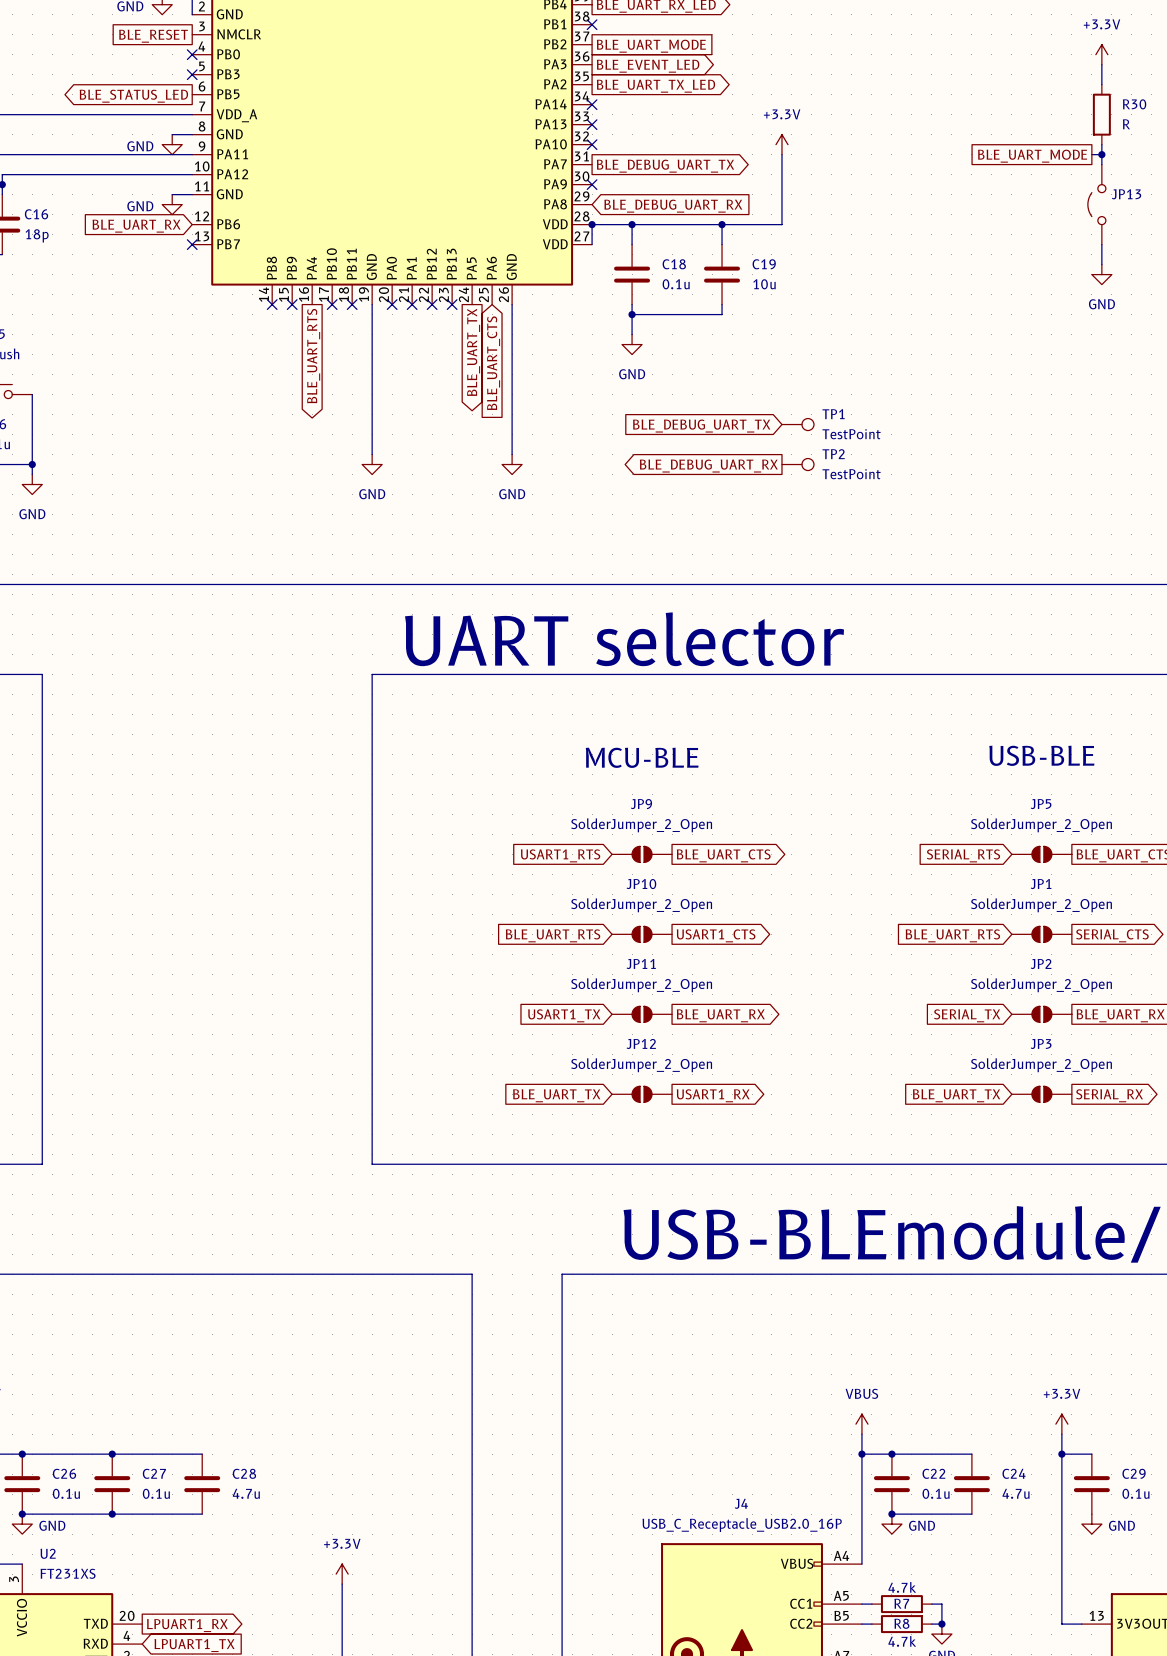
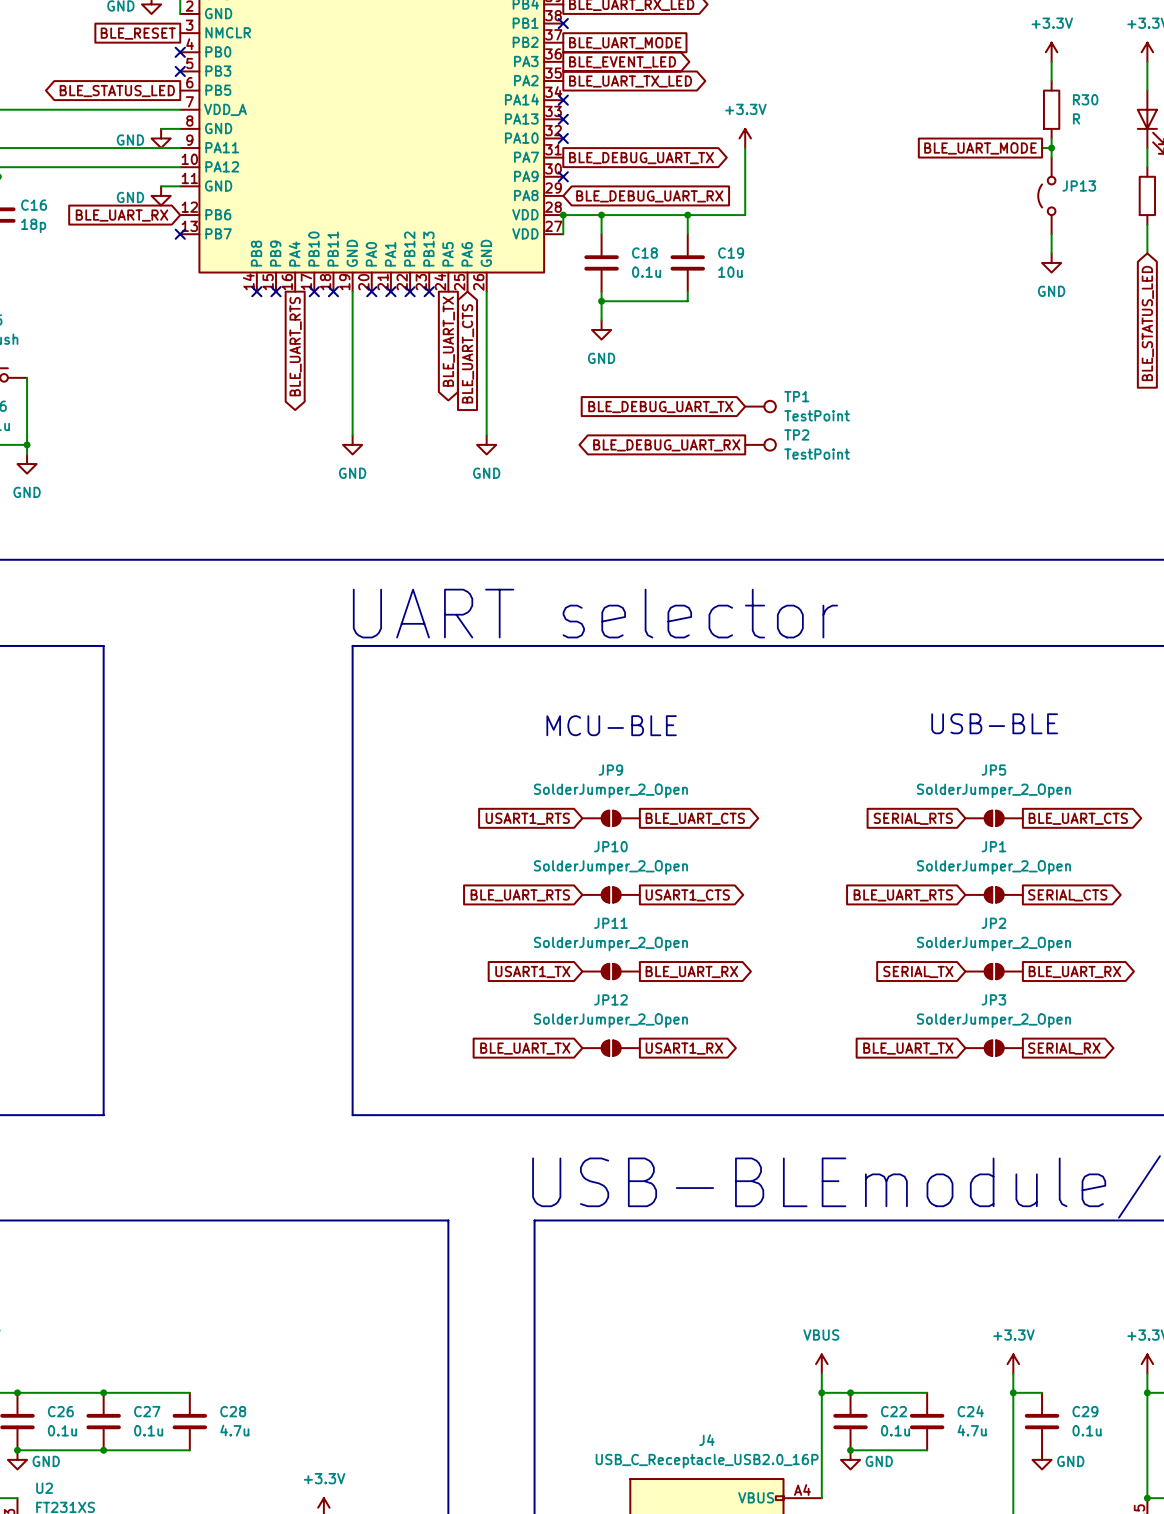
line: (42, 674) (42, 1164) -> (36, 645) (103, 645) (103, 1115) (36, 1115)

